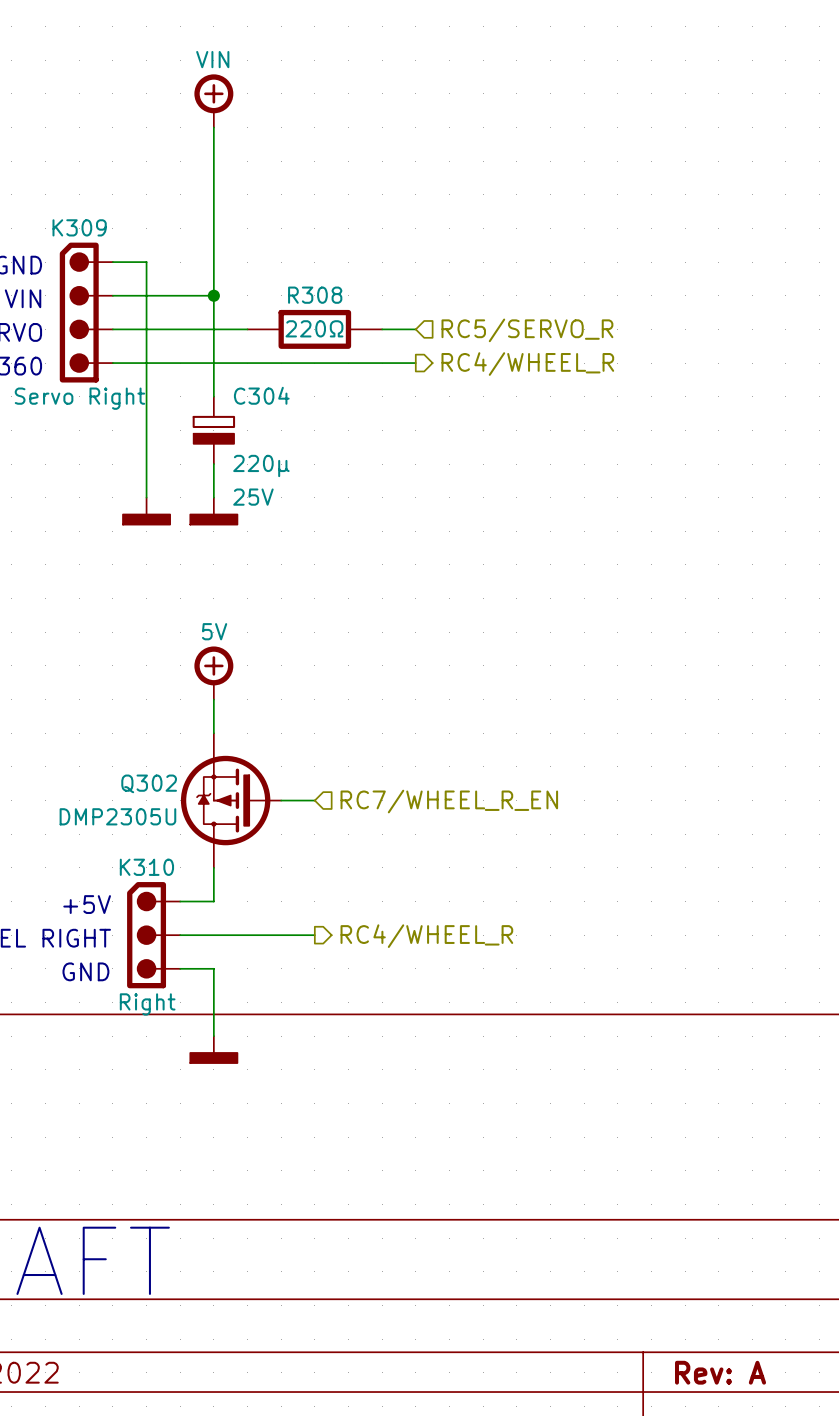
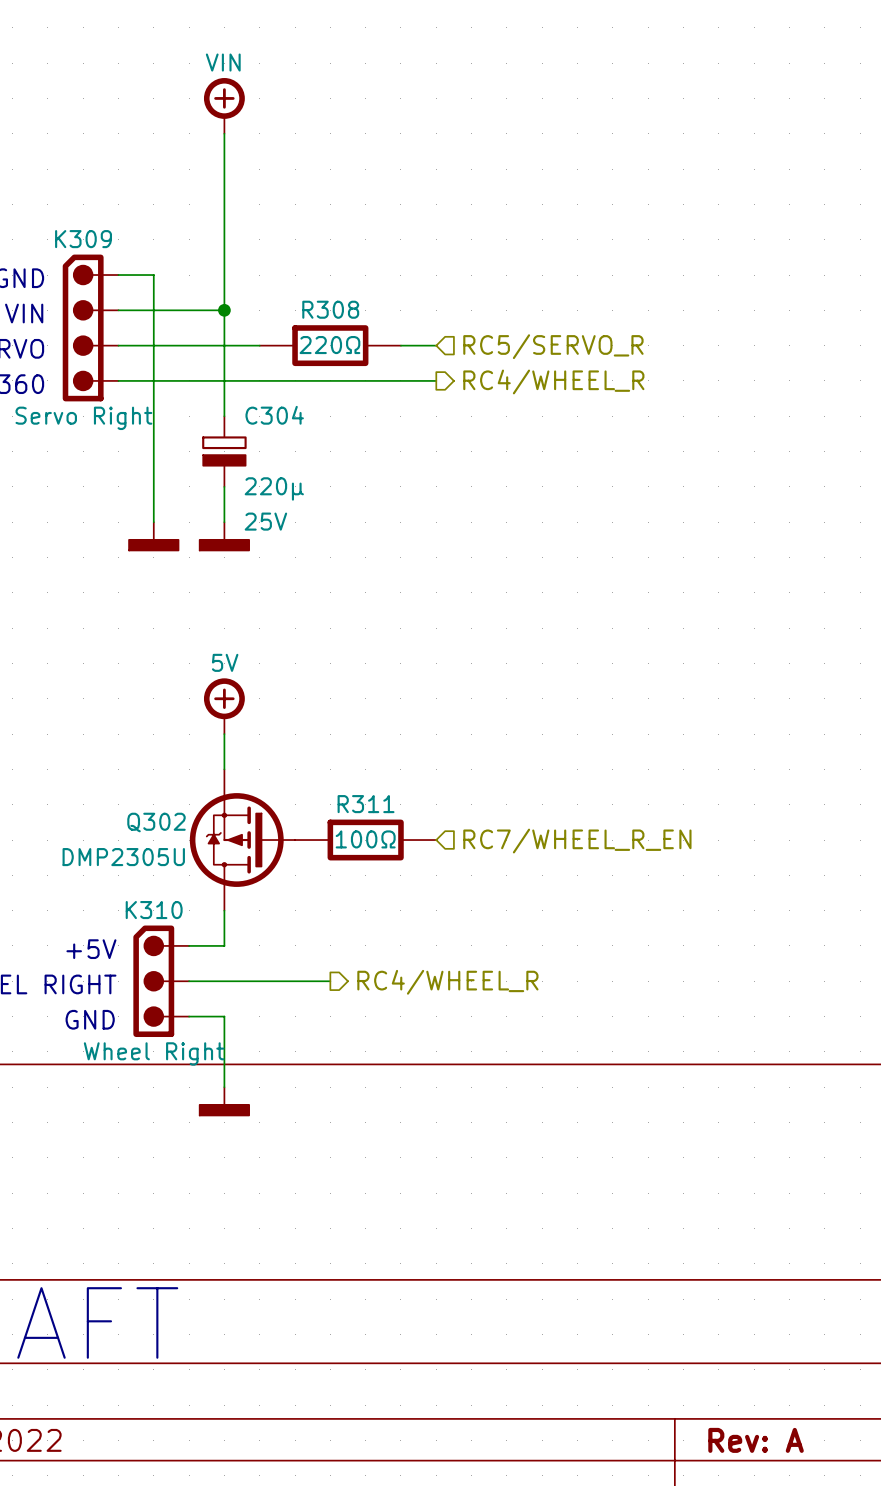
R311: none -> 100Ω (365, 840)
hierarchical label position: RC7/WHEEL_R_EN (449, 801) -> RC7/WHEEL_R_EN (577, 841)
K310 value: Right (147, 1004) -> Wheel Right (154, 1053)

